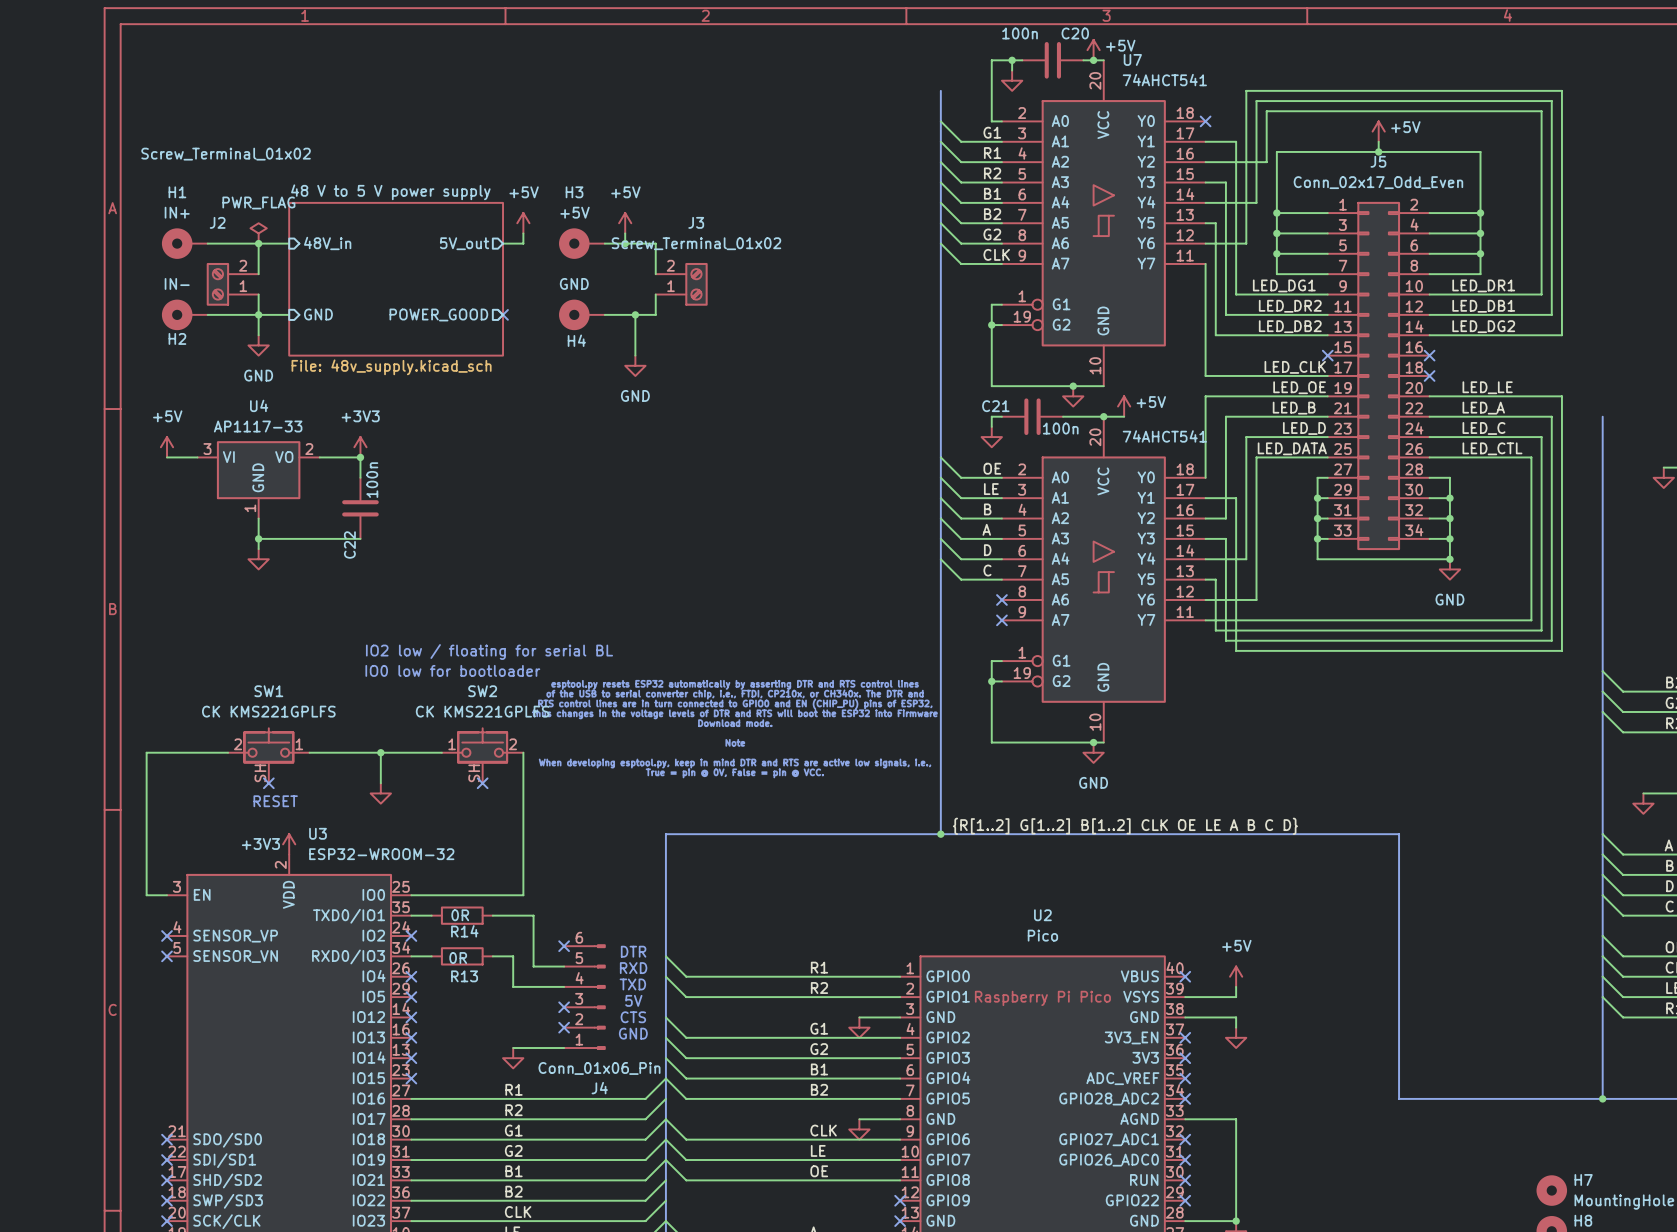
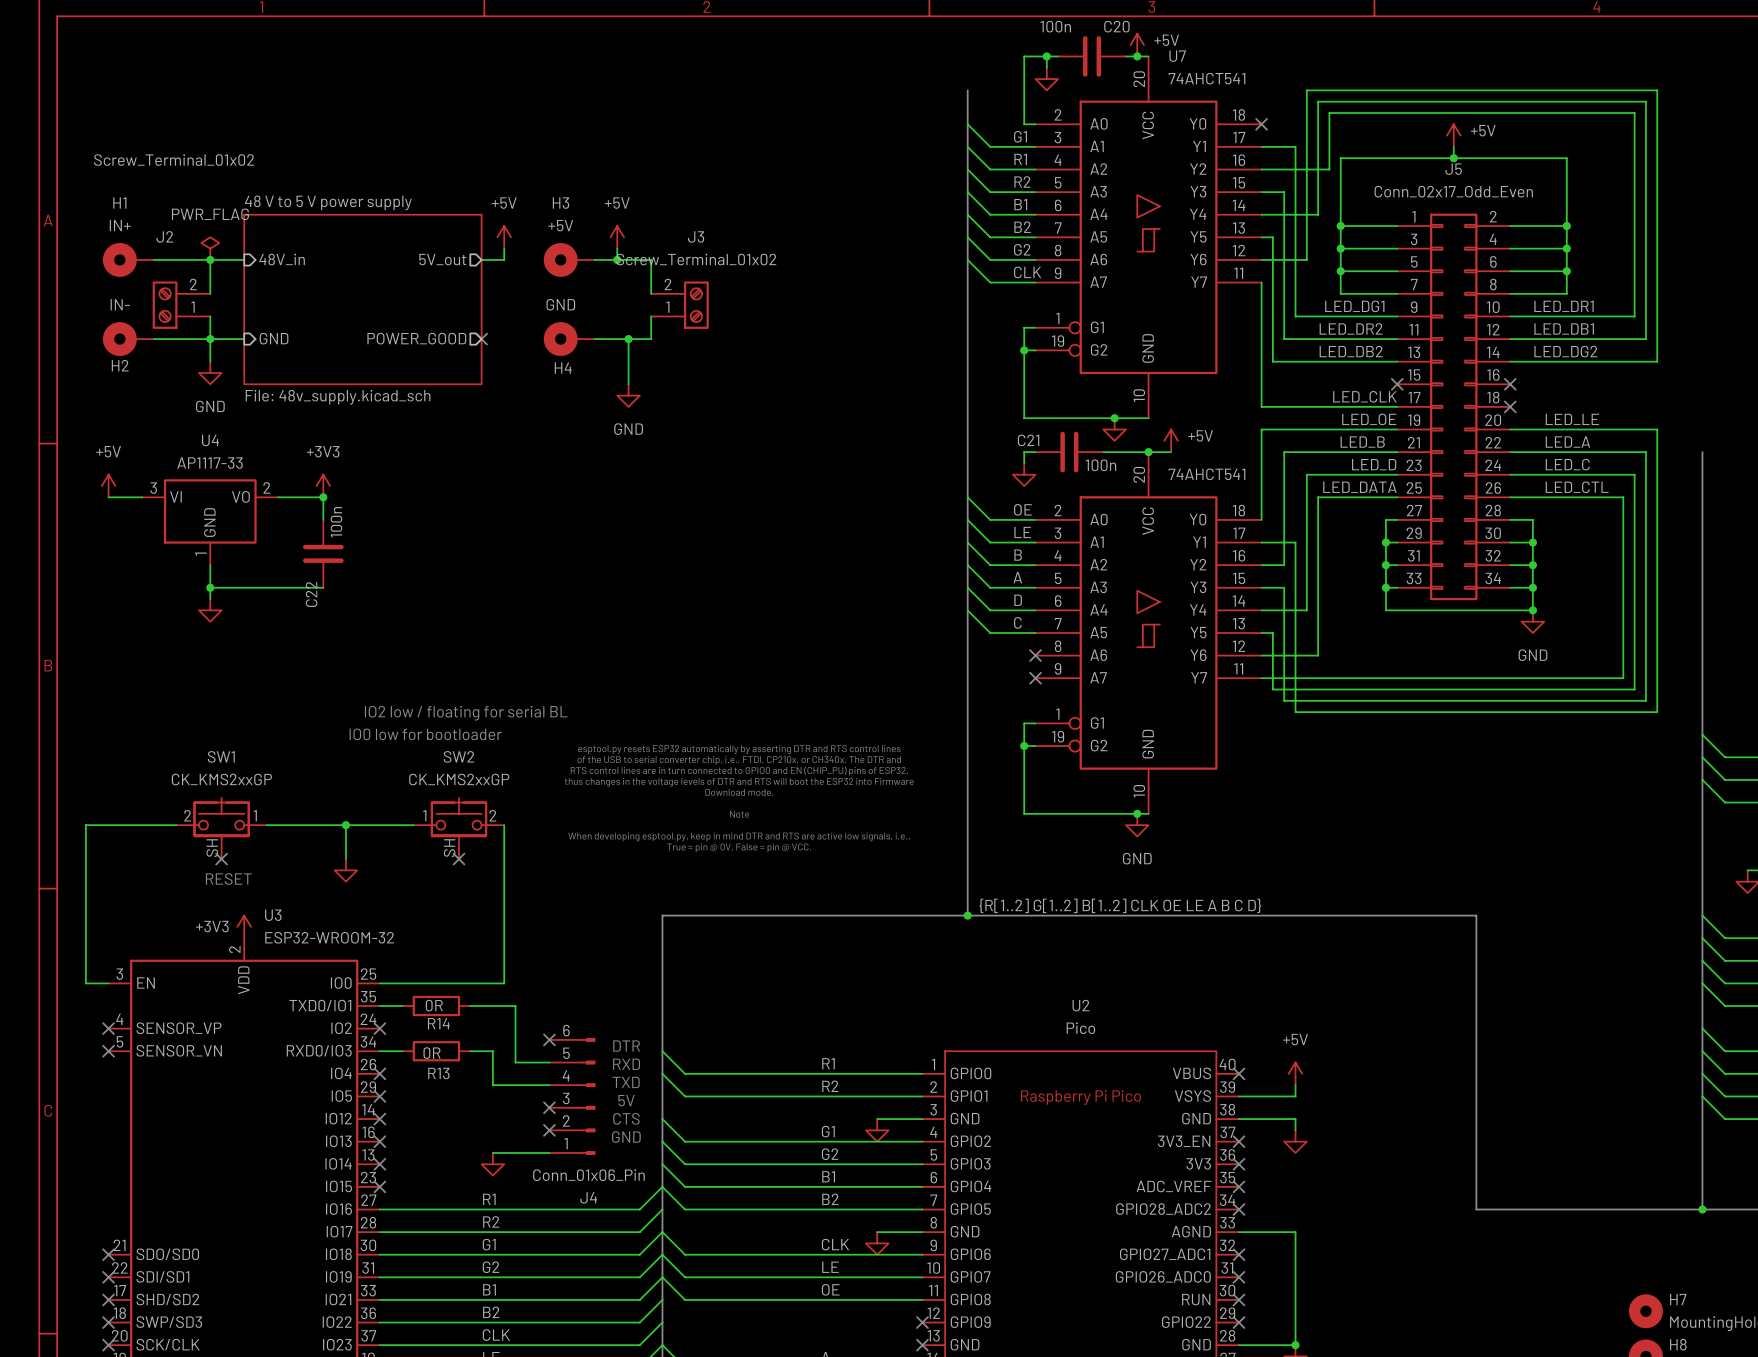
SW1 value: CK KMS221GPLFS (268, 711) -> CK_KMS2xxGP (221, 779)
SW2 value: CK KMS221GPLFS (482, 711) -> CK_KMS2xxGP (459, 779)

